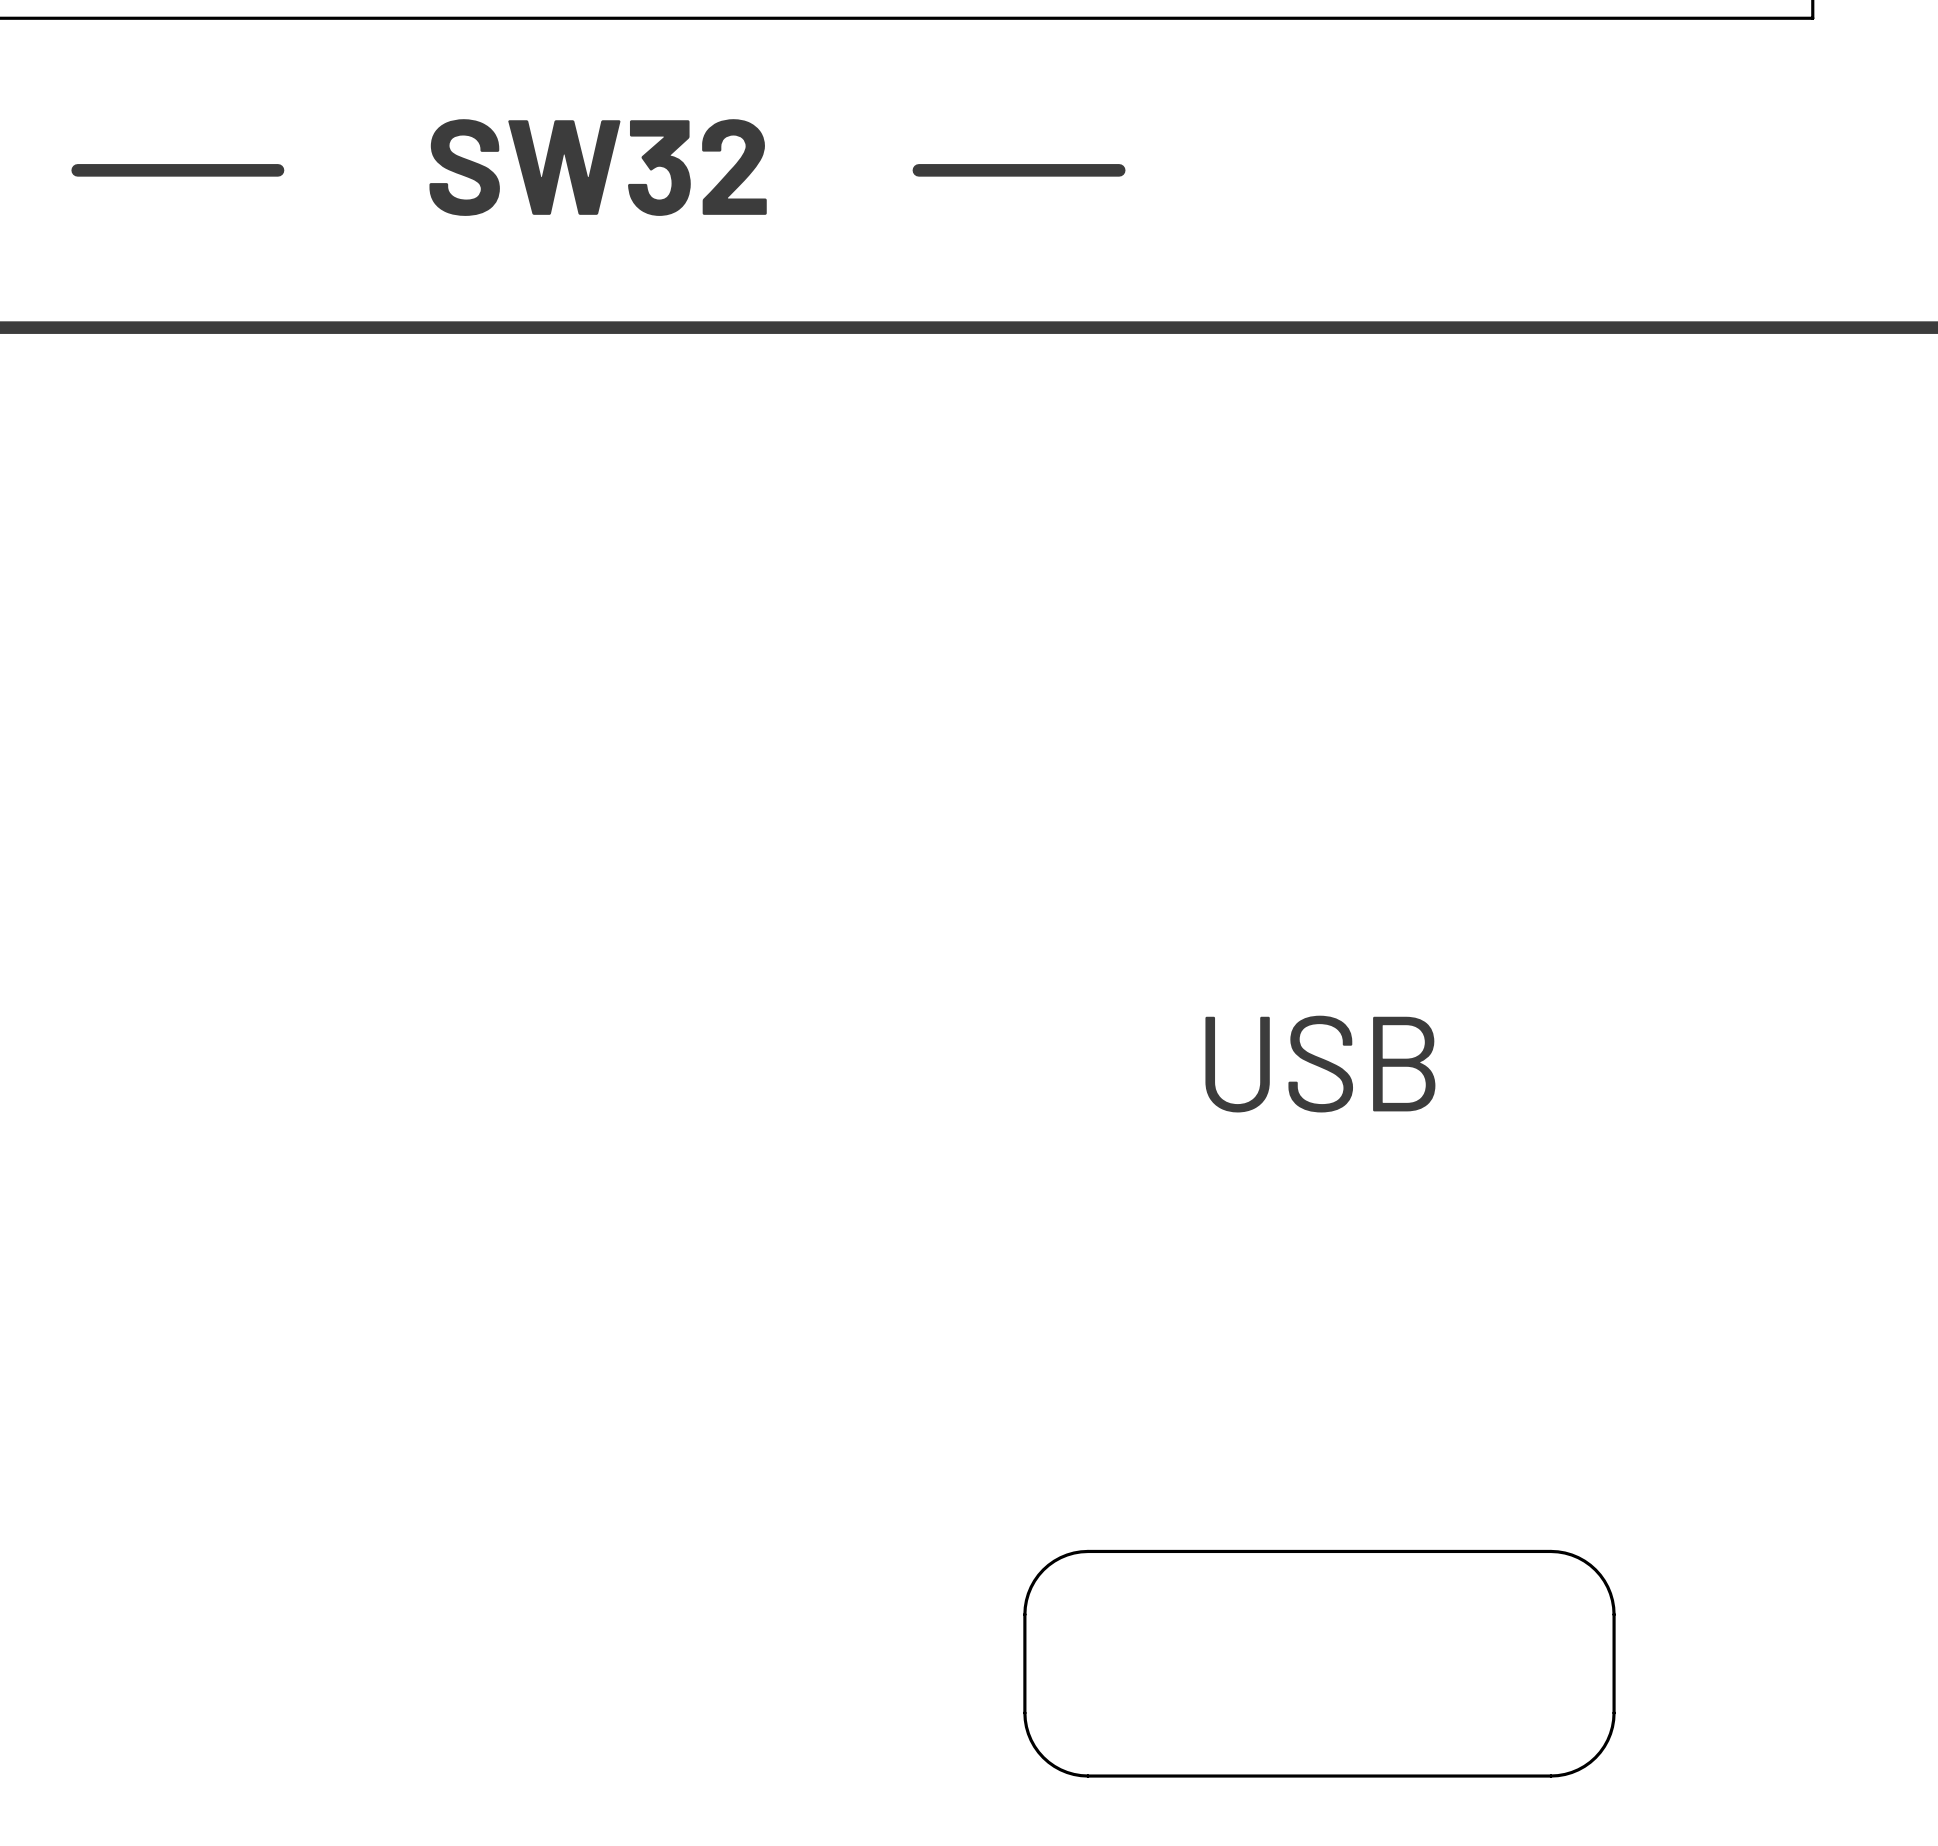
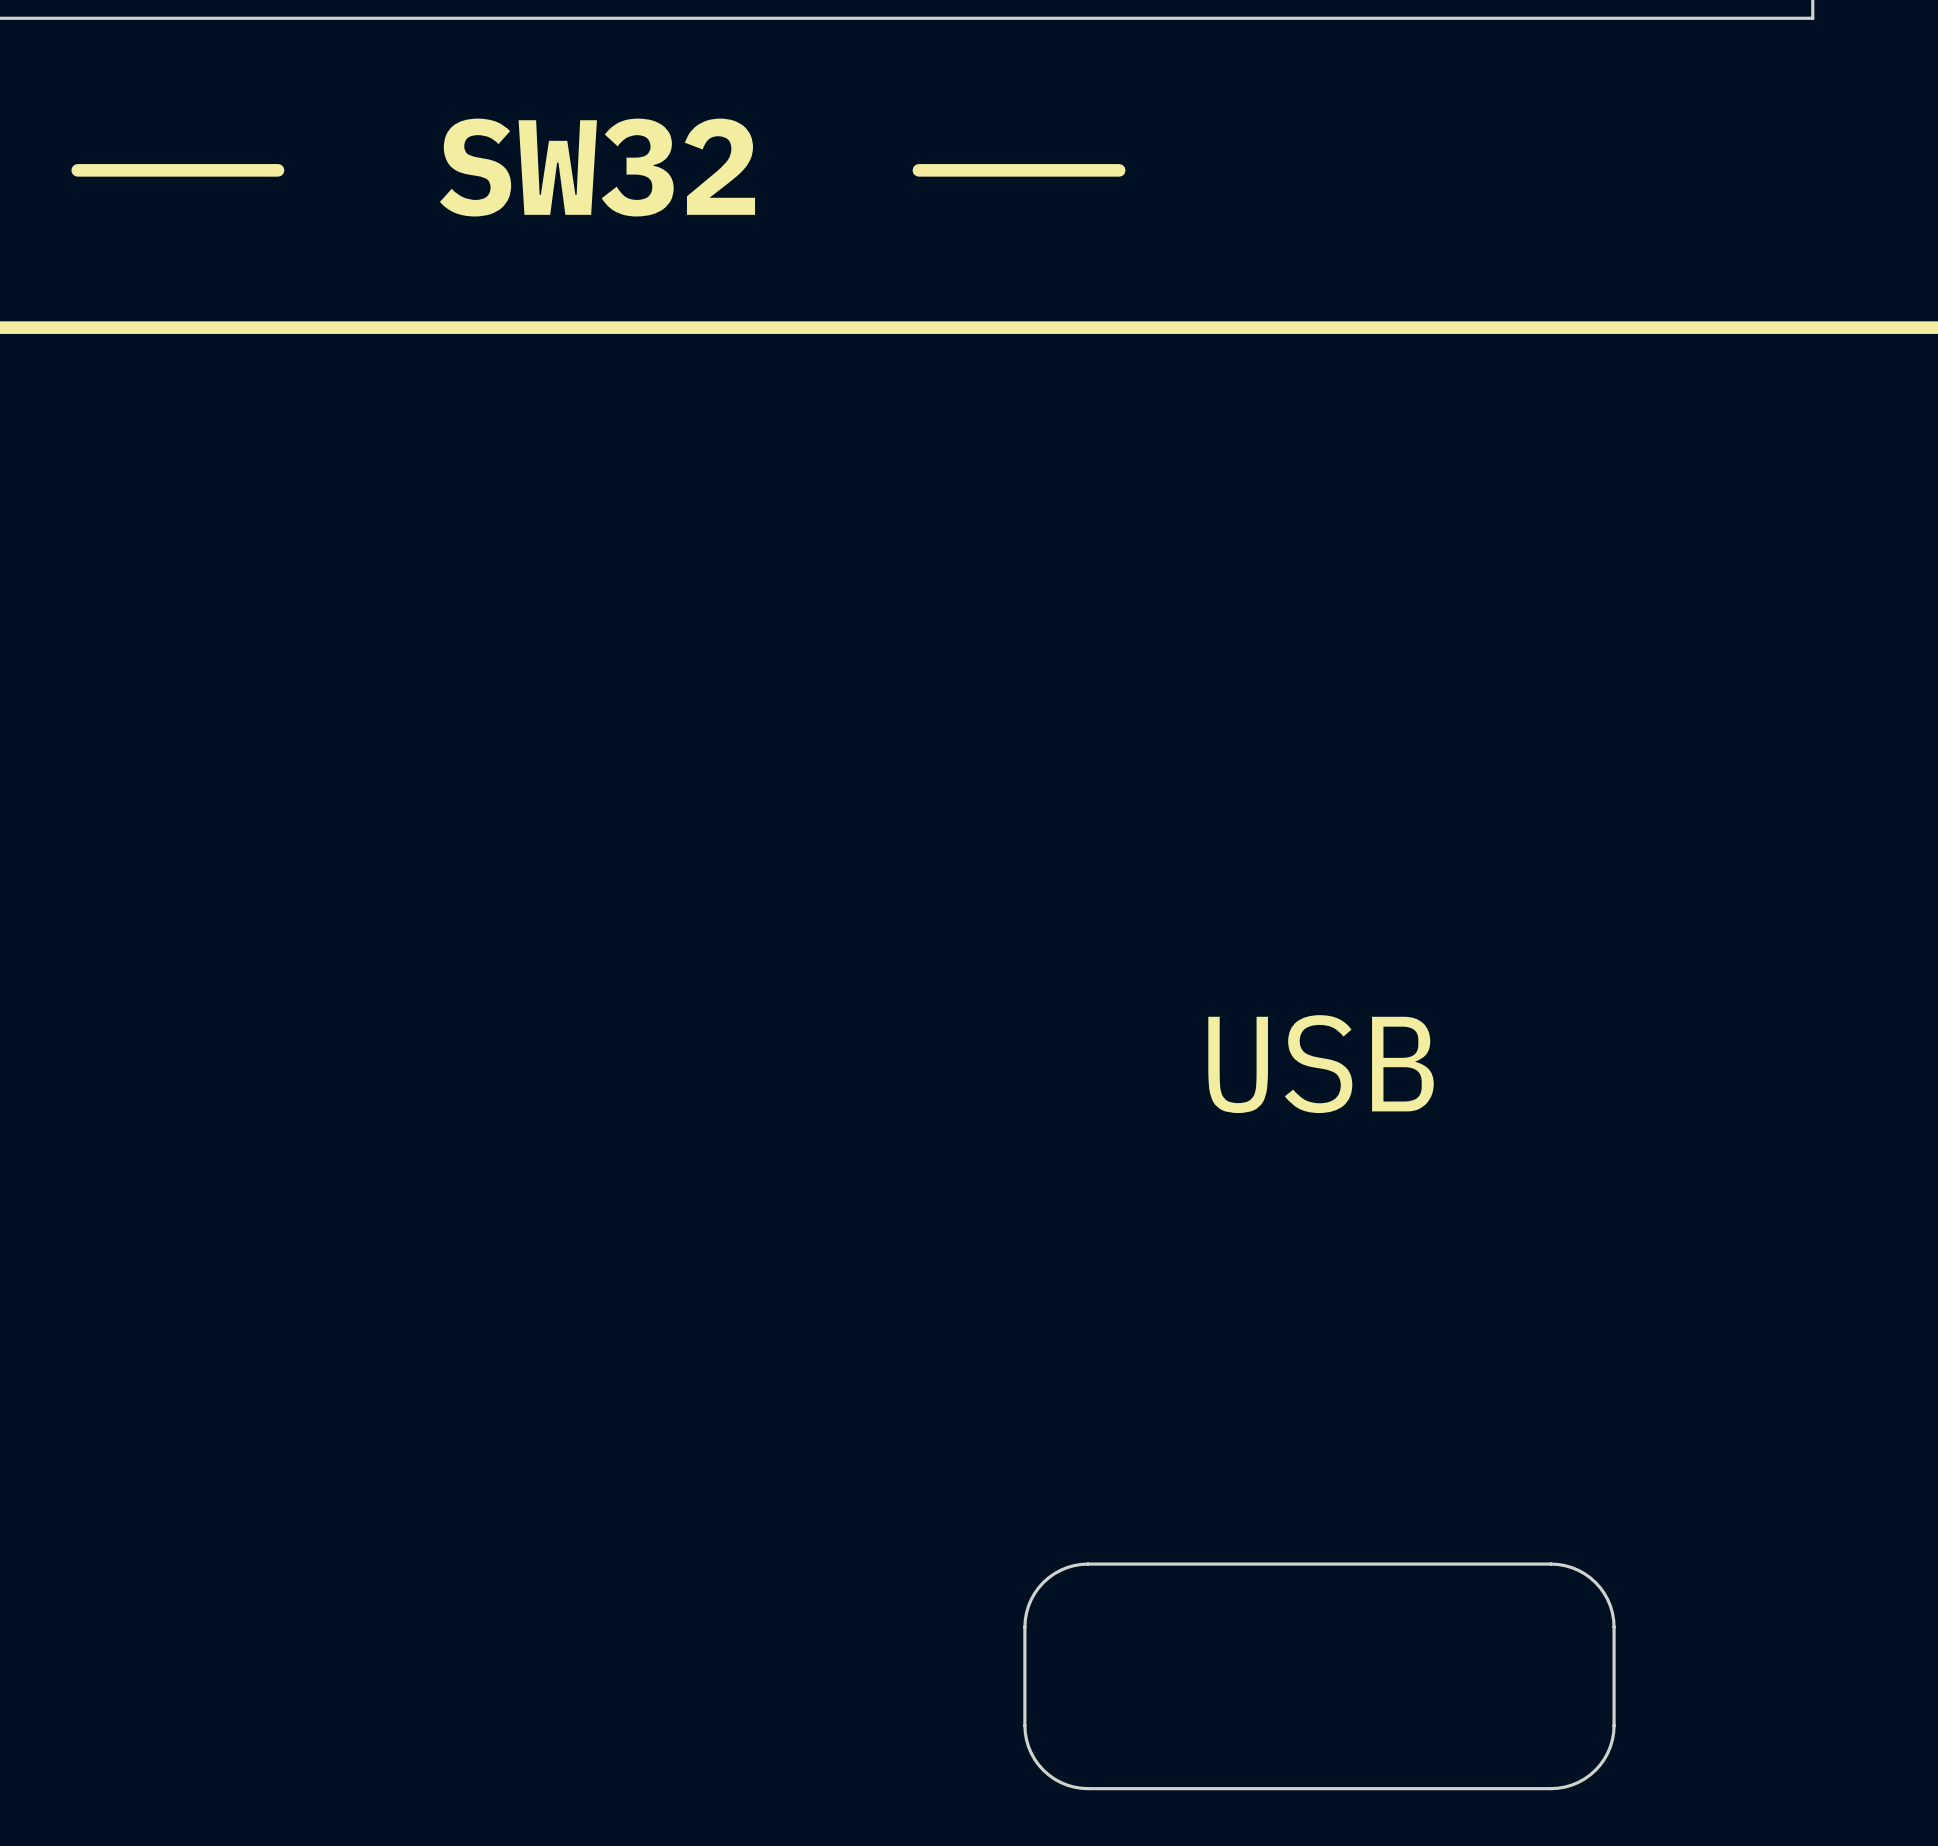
board edge: (1024, 1627) (1026, 1600) (1031, 1587) (1038, 1575) (1048, 1565) (1060, 1557) (1073, 1553) (1087, 1551) (1558, 1551) (1578, 1557) (1590, 1565) (1600, 1575) (1607, 1587) (1612, 1600) (1614, 1627) -> (1024, 1627) (1028, 1606) (1034, 1593) (1043, 1582) (1060, 1570) (1073, 1565) (1087, 1564) (1558, 1564) (1578, 1570) (1590, 1577) (1600, 1587) (1610, 1606) (1614, 1627)
board edge: (1024, 1712) (1026, 1726) (1031, 1740) (1043, 1757) (1054, 1766) (1067, 1772) (1087, 1776) (1558, 1775) (1578, 1769) (1595, 1757) (1604, 1746) (1610, 1733) (1614, 1712) -> (1024, 1712) (1026, 1739) (1031, 1752) (1038, 1764) (1048, 1774) (1060, 1782) (1073, 1787) (1087, 1788) (1558, 1788) (1571, 1785) (1584, 1778) (1600, 1764) (1607, 1752) (1612, 1739) (1614, 1712)

